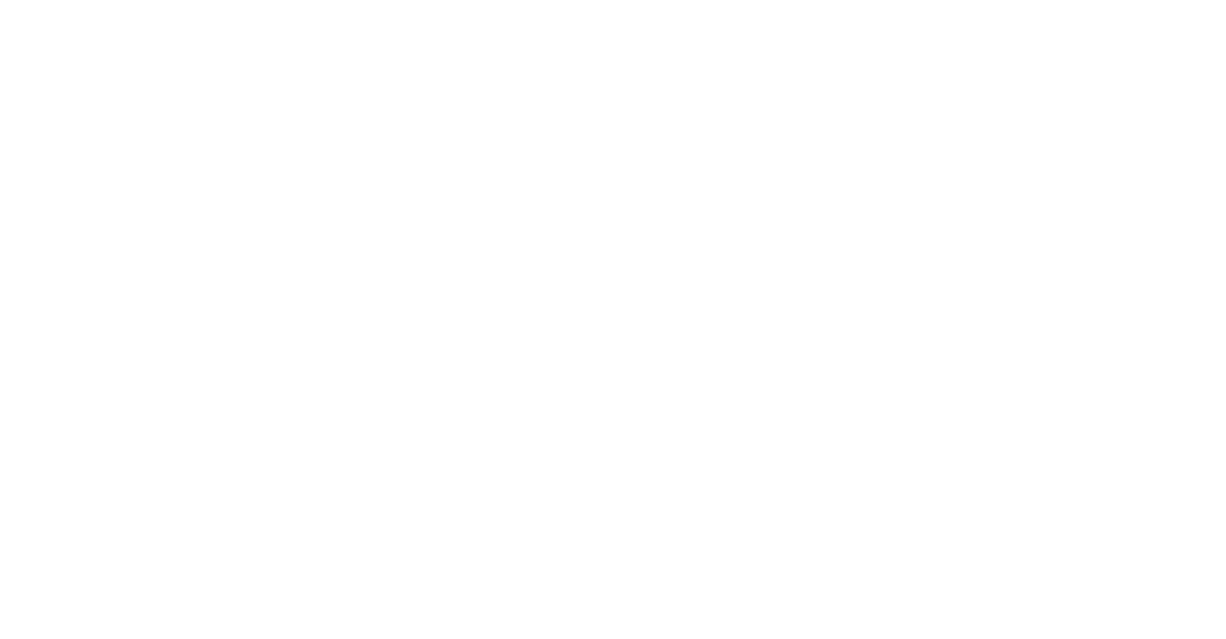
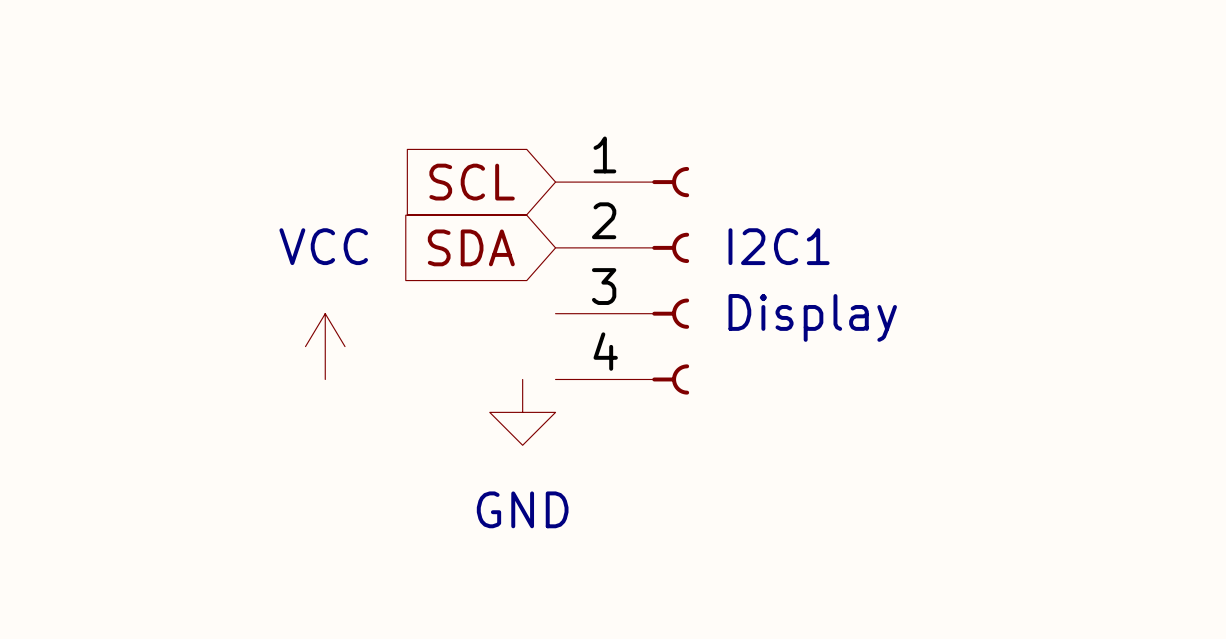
global label: none -> SCL (472, 182)
global label: none -> SDA (471, 247)
I2C1: none -> Display (622, 280)
power symbol: none -> VCC (325, 346)
power symbol: none -> GND (522, 412)

